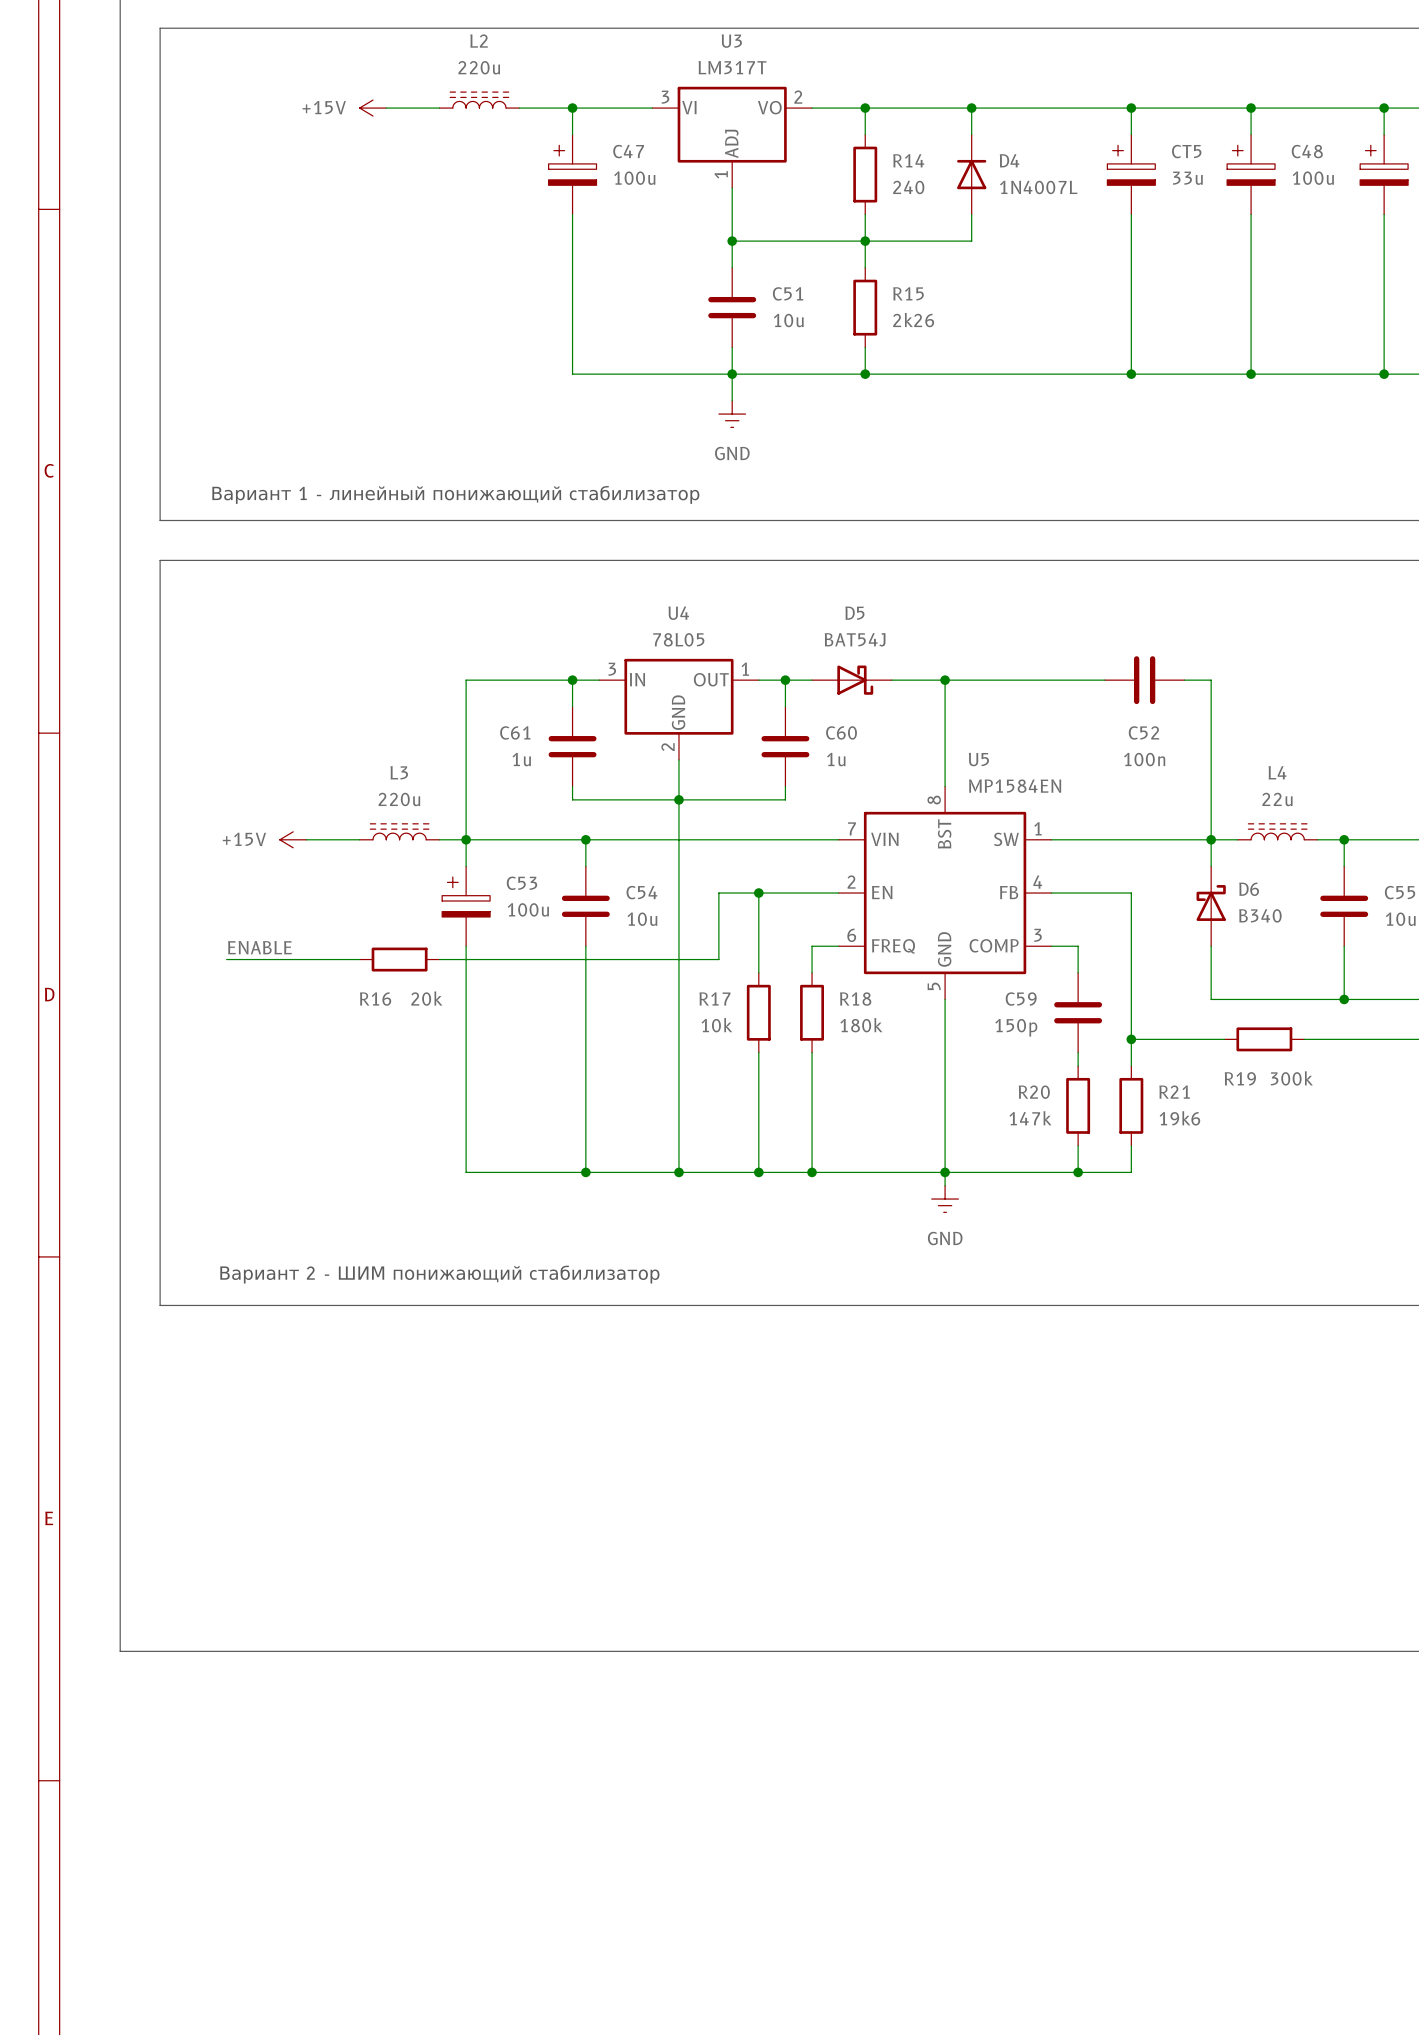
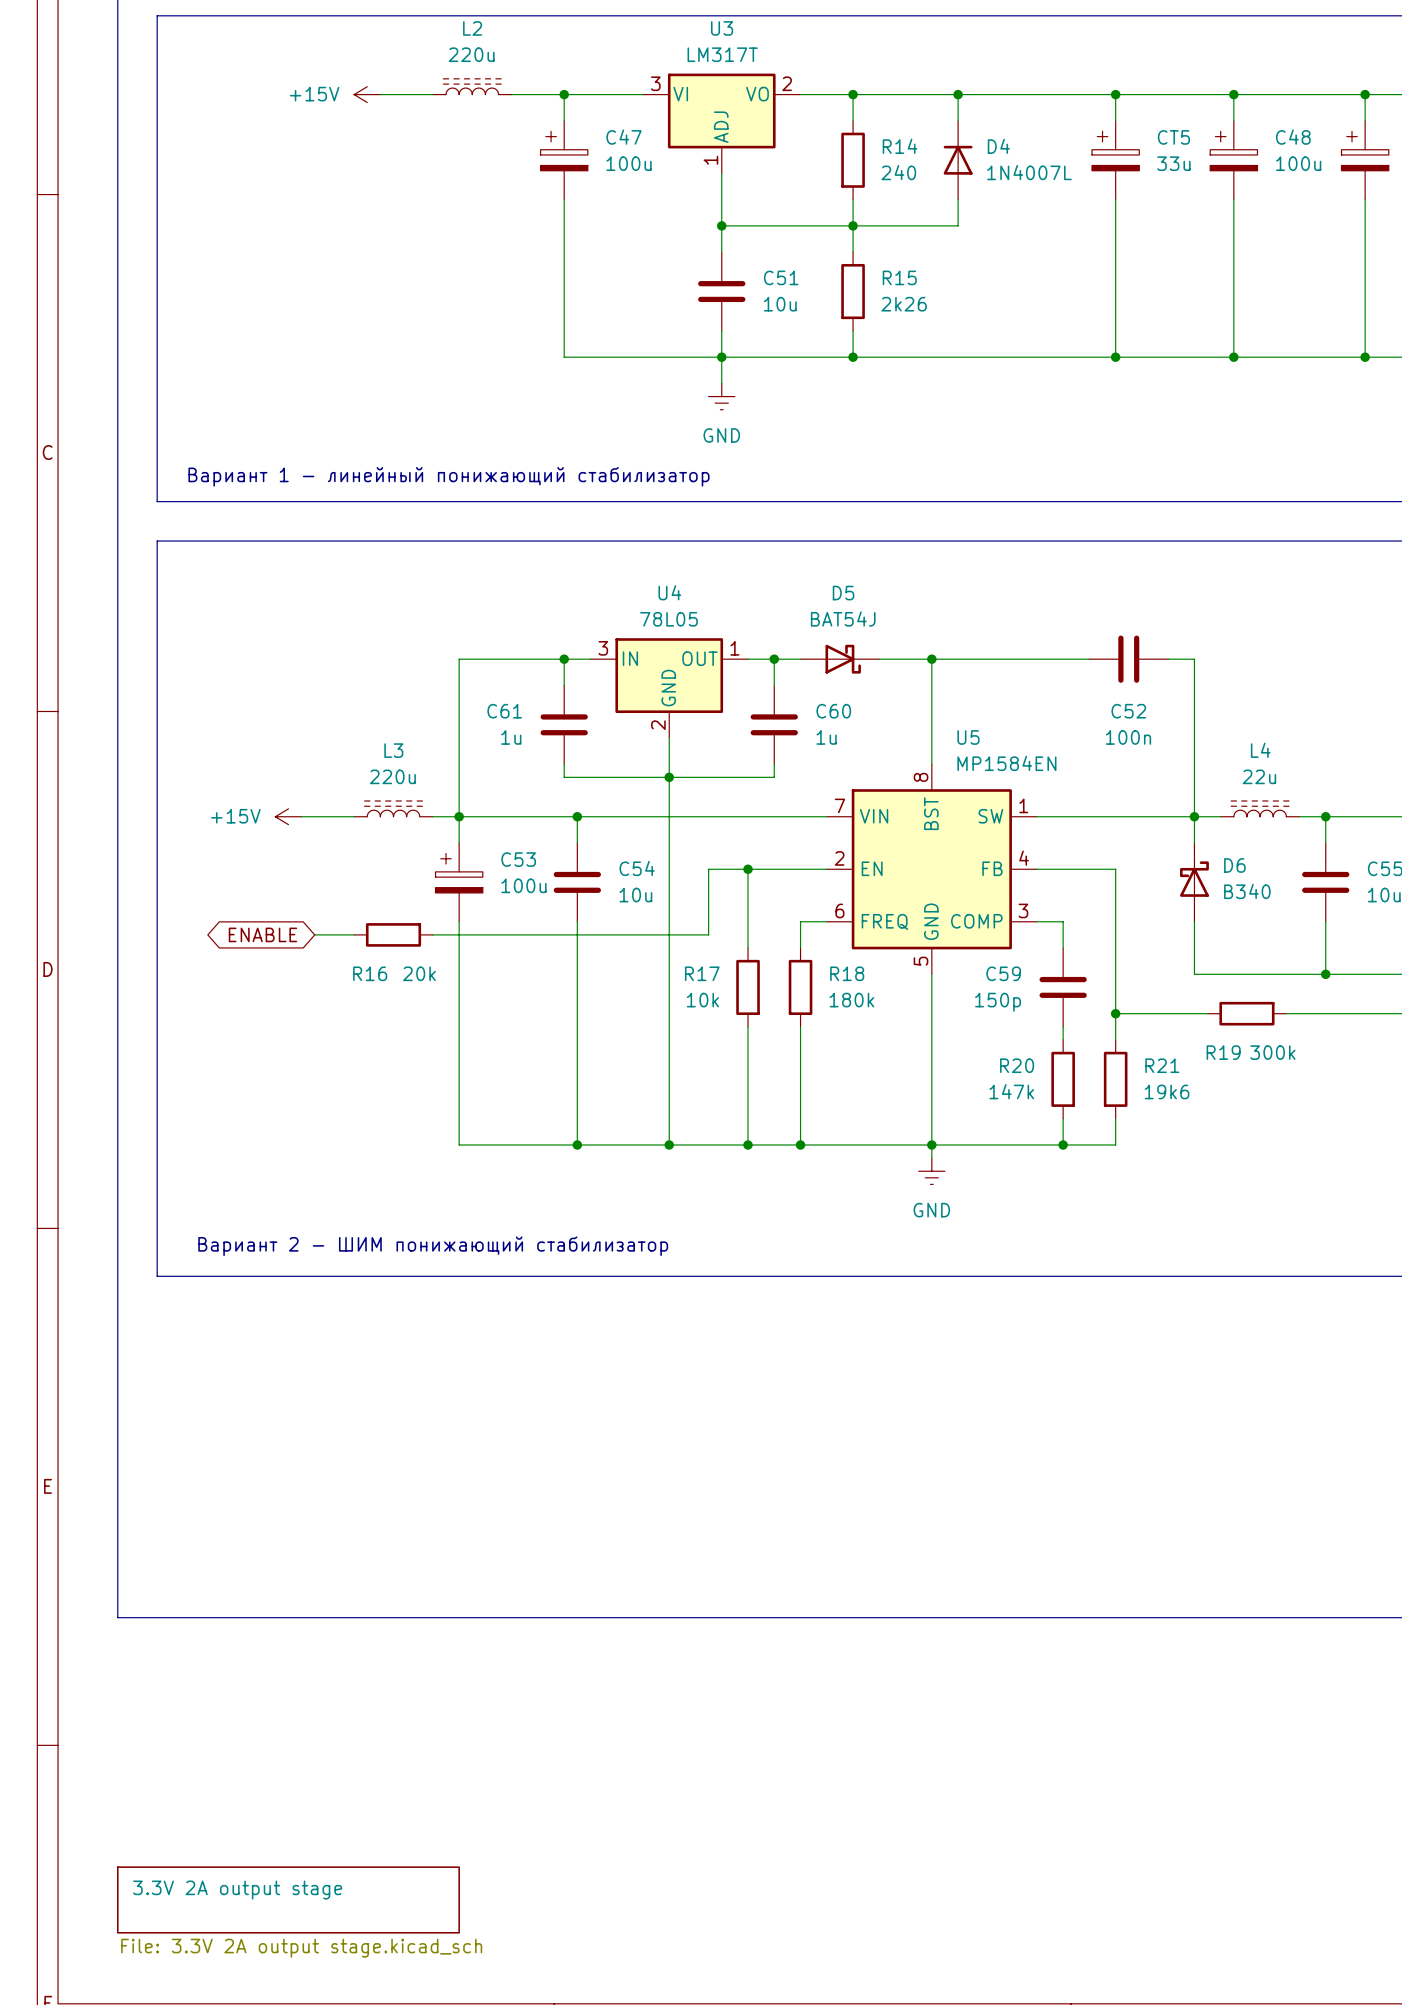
label: ENABLE (259, 947) -> none
wire: (226, 959) (319, 959) -> none
global label: none -> ENABLE (262, 934)
sheet 3.3V 2A output stage: none -> File: 3.3V 2A output stage.kicad_sch (288, 1899)

